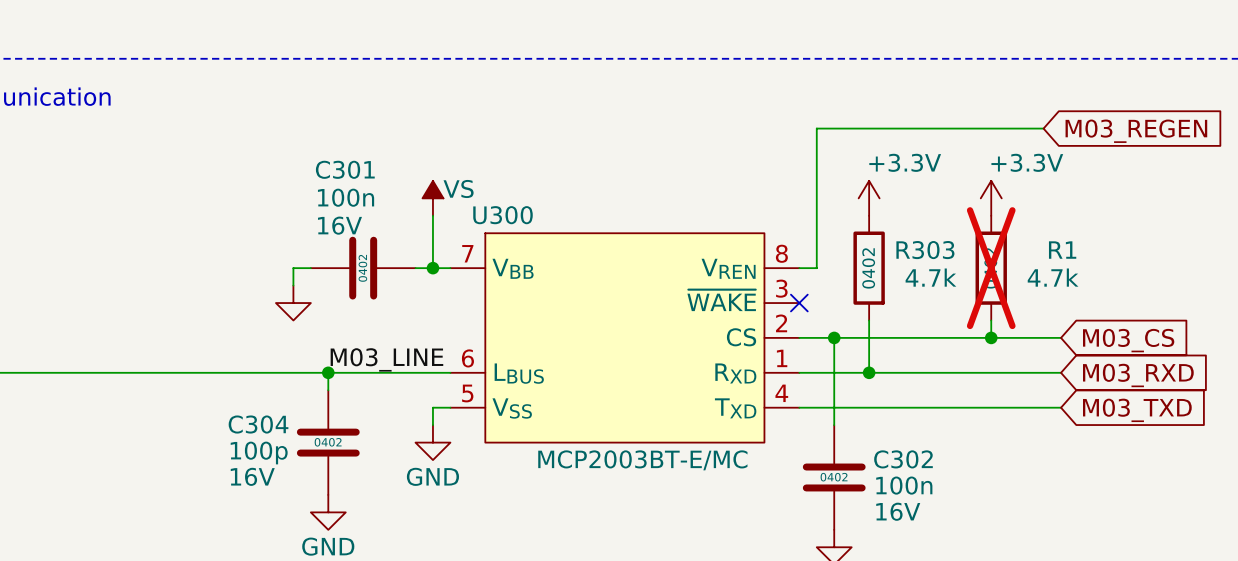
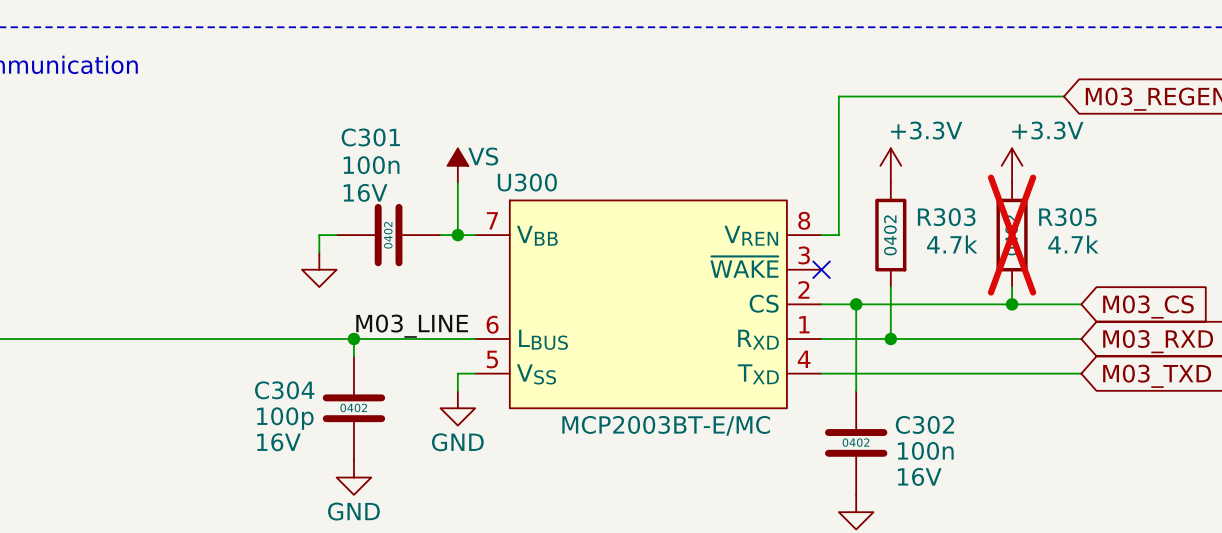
R1 name: R1 (1062, 250) -> R305 (1067, 217)

